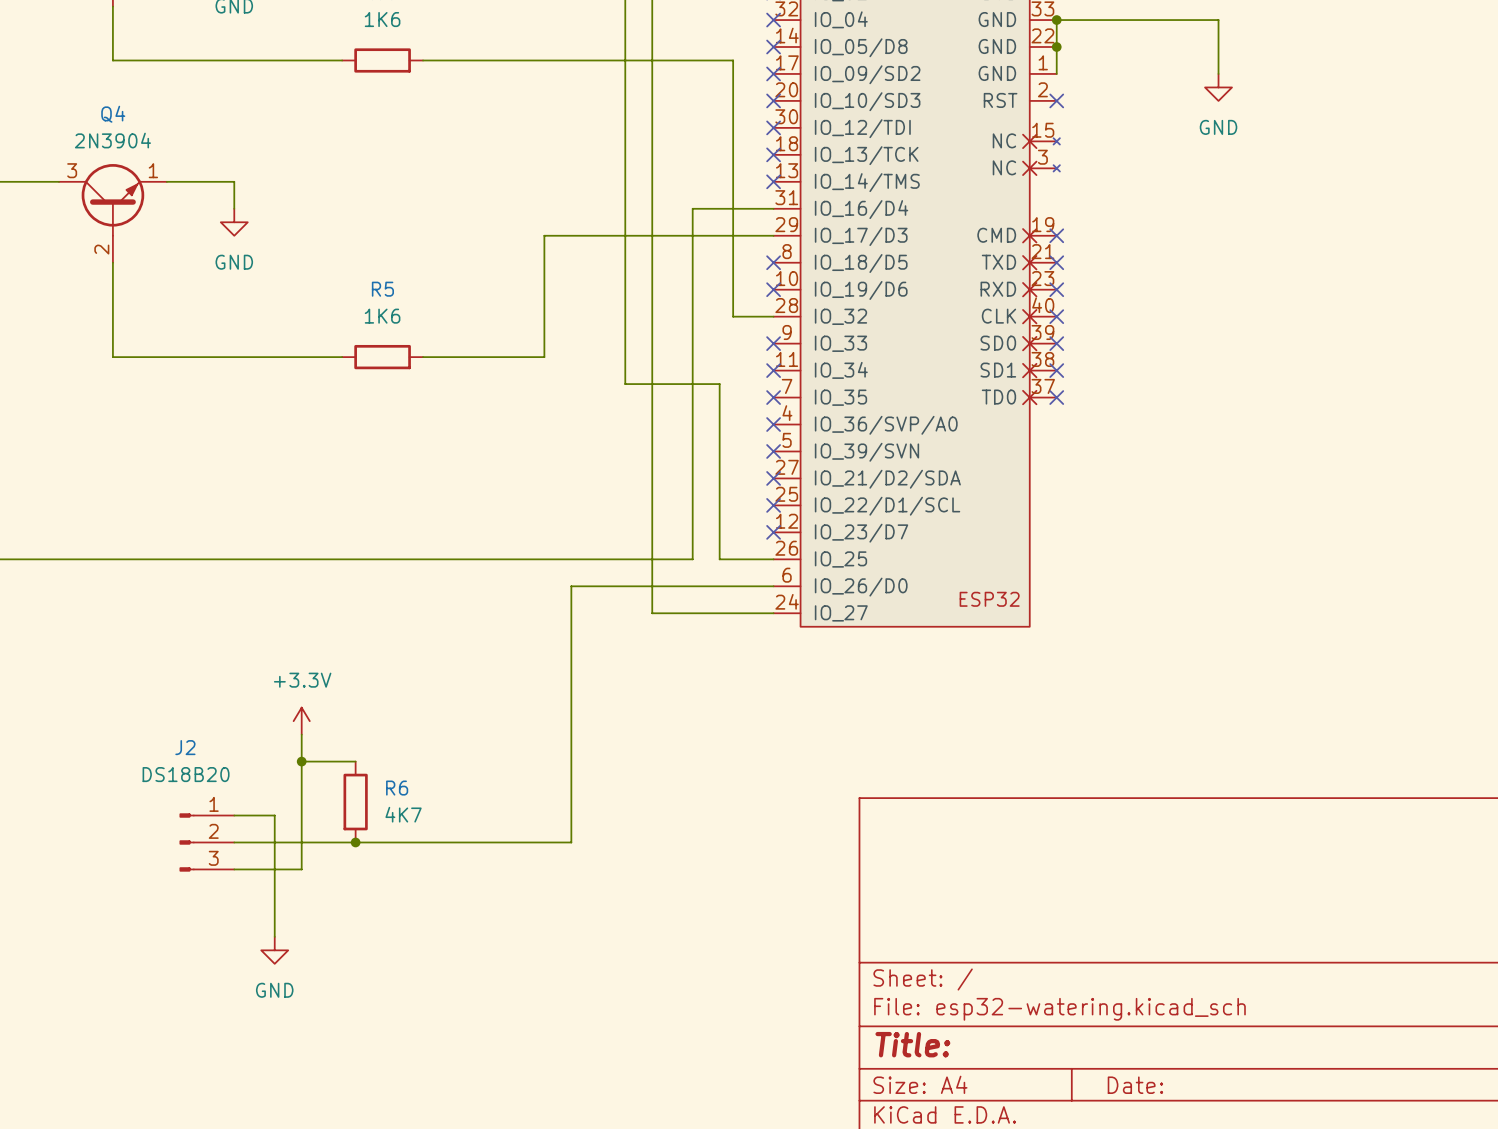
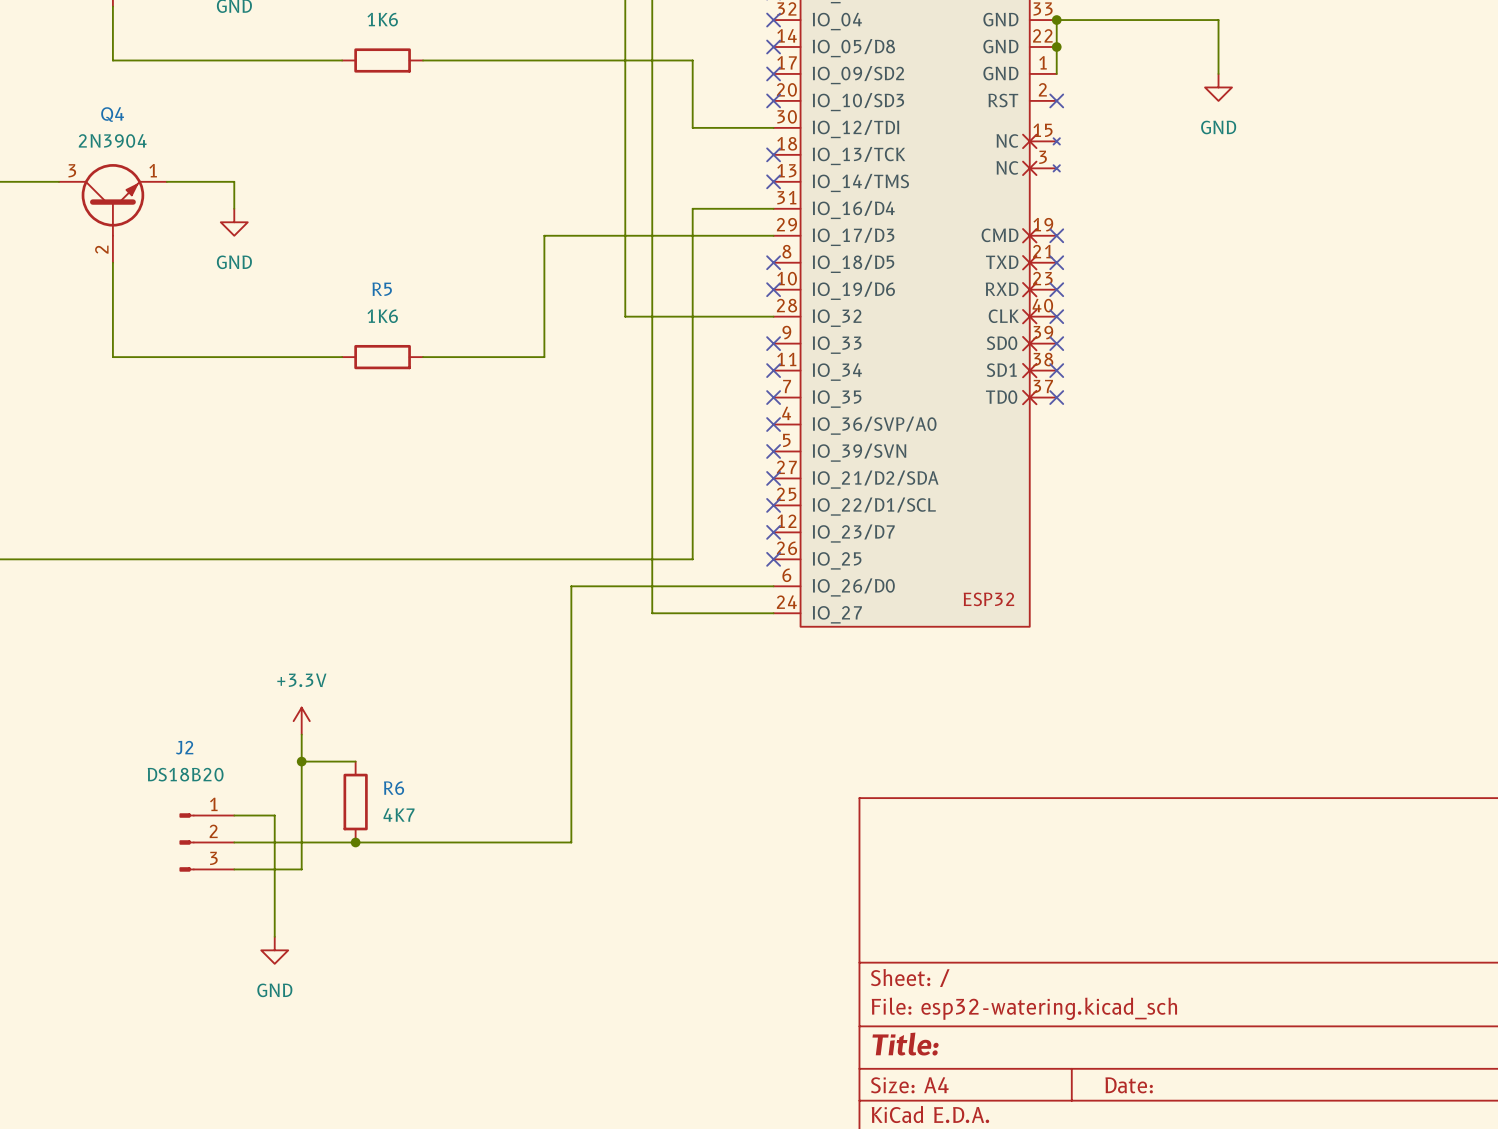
wire: (692, 60) (733, 60) (733, 316) -> (692, 60) (692, 127) (773, 127)
no-connect mark: (773, 127) -> none
wire: (625, 316) (625, 384) (719, 384) (719, 559) (773, 559) -> (625, 316) (733, 316)
no-connect mark: none -> (773, 559)

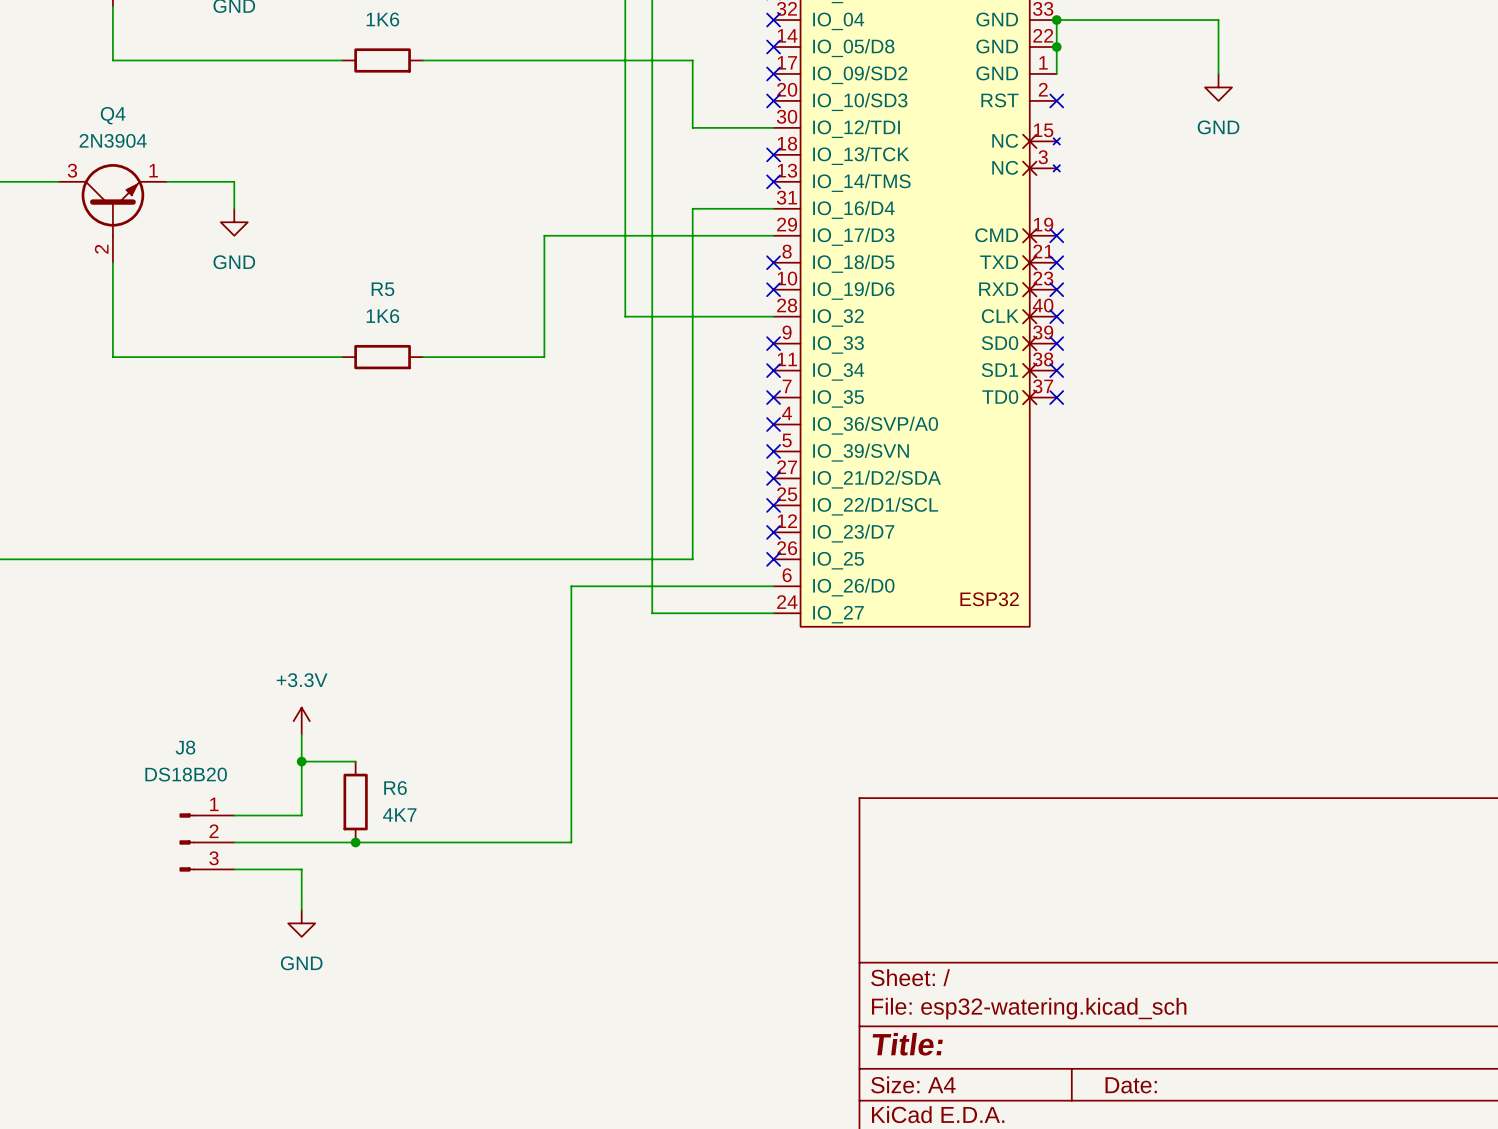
J2 name: J2 (184, 747) -> J8 (185, 747)
wire: (274, 815) (274, 936) -> none
wire: (301, 815) (301, 869) -> (301, 815) (274, 815)
wire: none -> (301, 869) (301, 909)
power symbol position: GND (274, 950) -> GND (301, 923)

